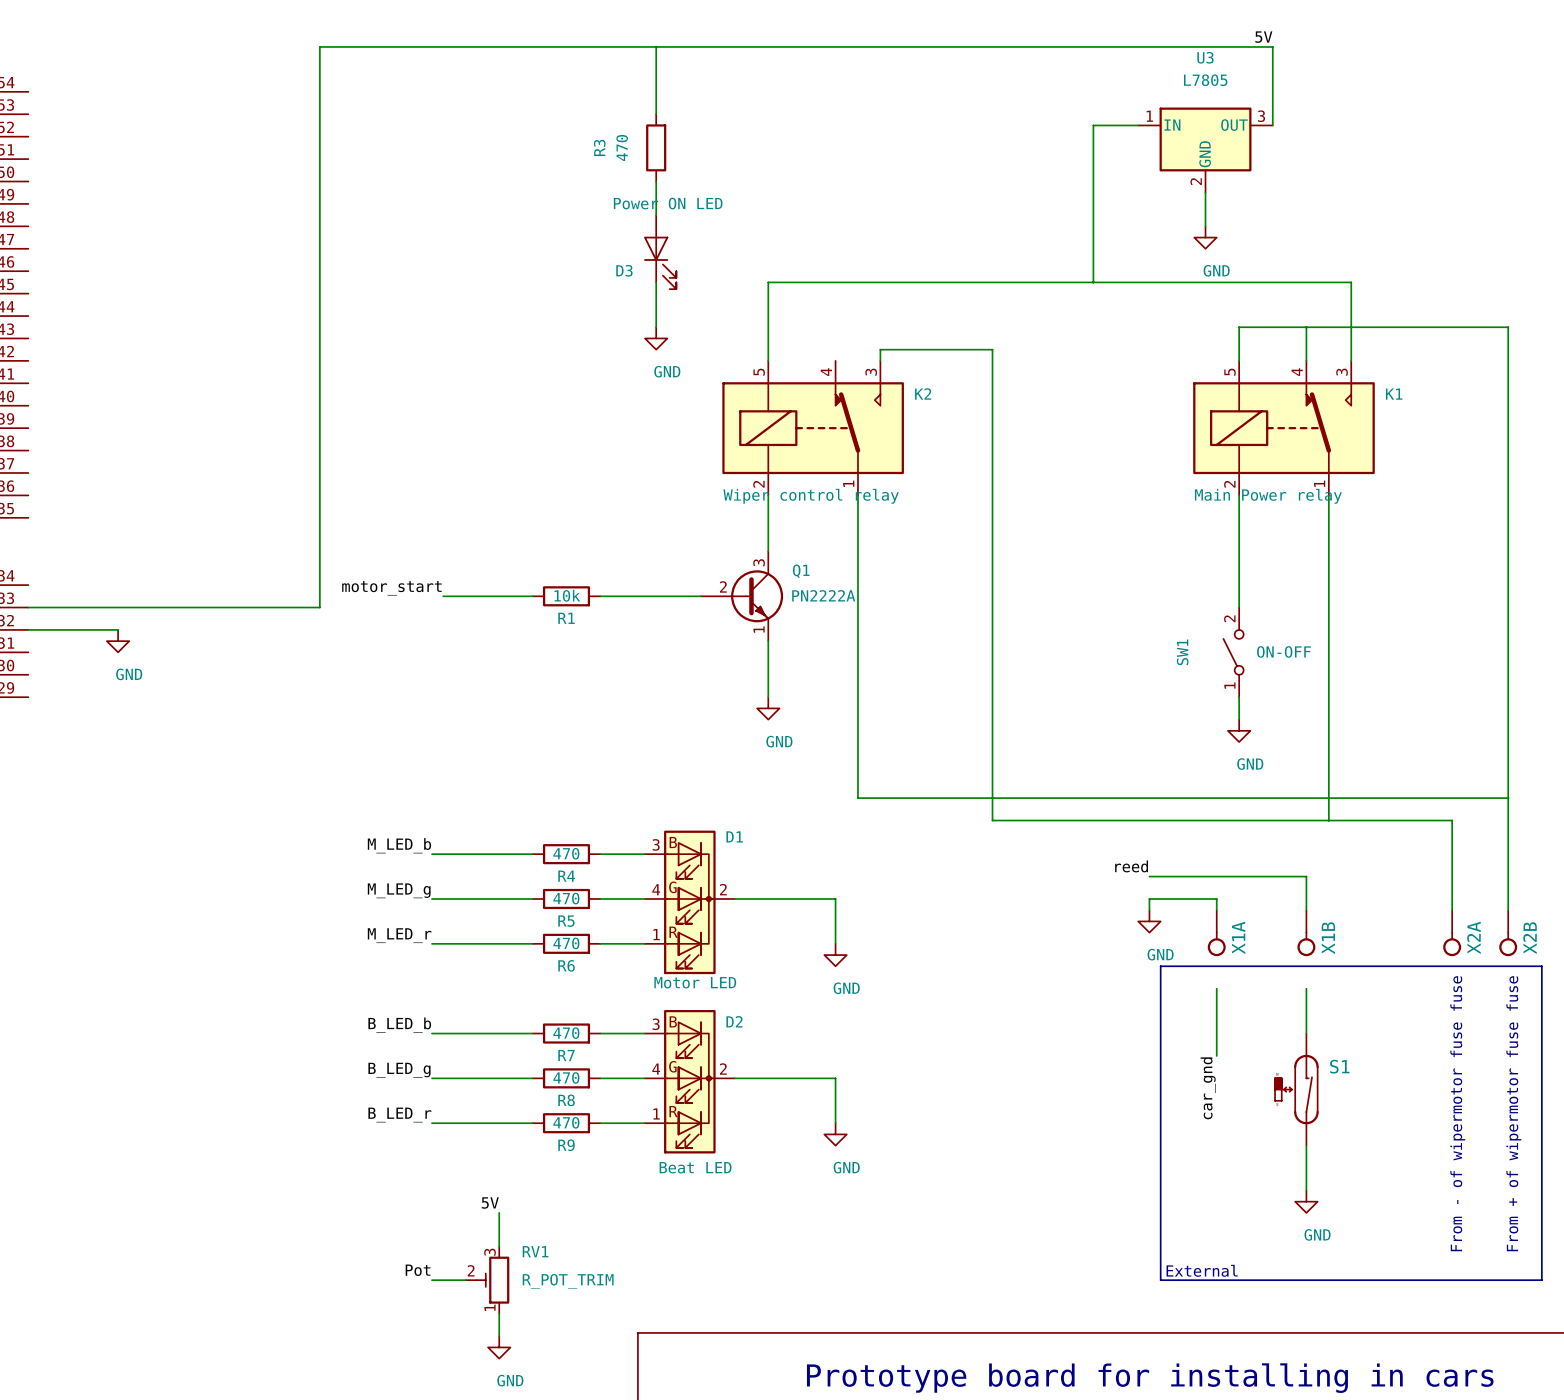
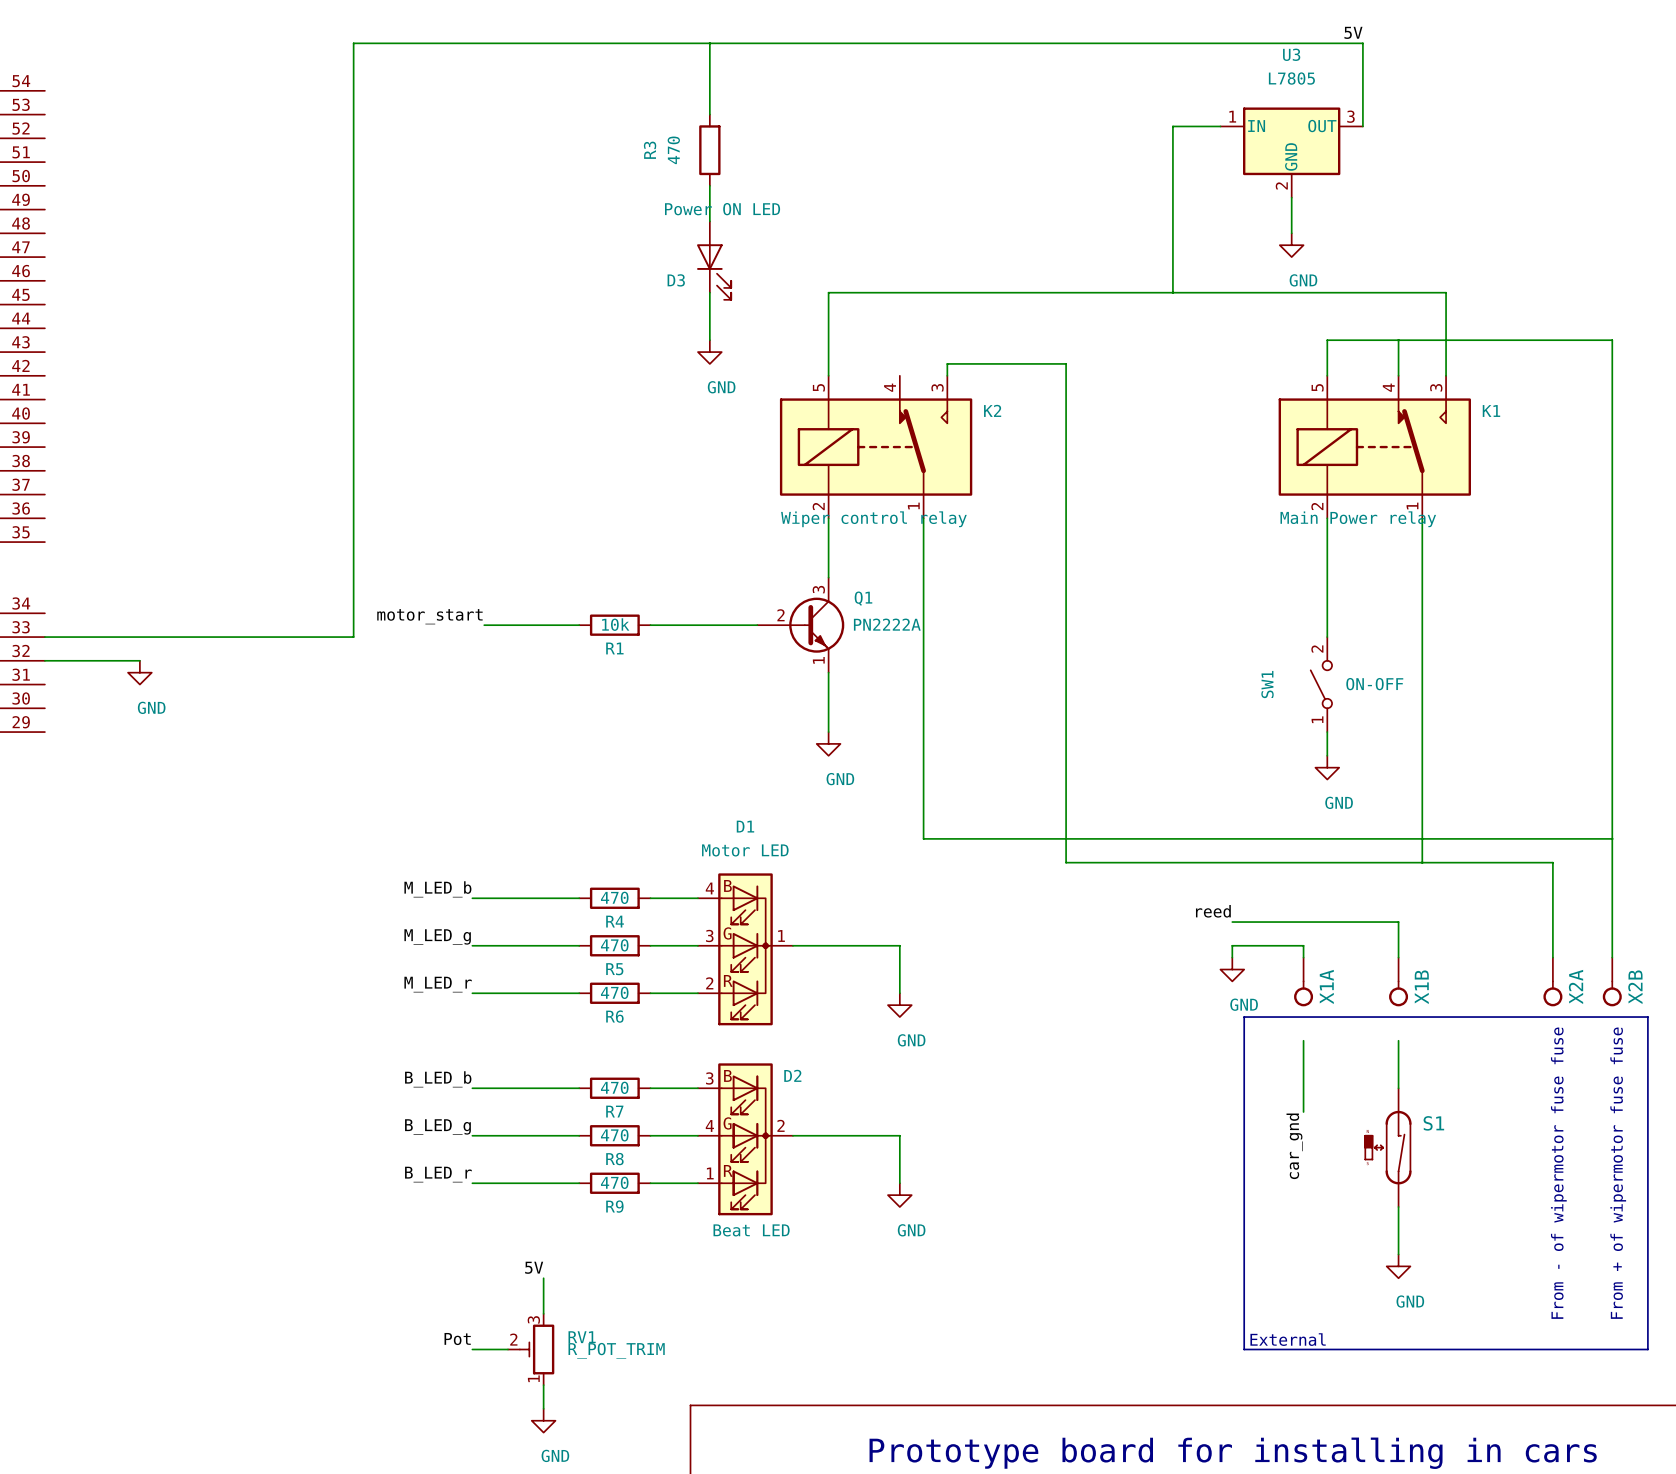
D1 symbol: [644, 830, 735, 975] -> [697, 873, 793, 1026]
D1 name position: D1 (734, 836) -> D1 (745, 826)
D1 value position: Motor LED (695, 982) -> Motor LED (745, 850)
RV1 name position: RV1 (535, 1251) -> RV1 (582, 1337)

